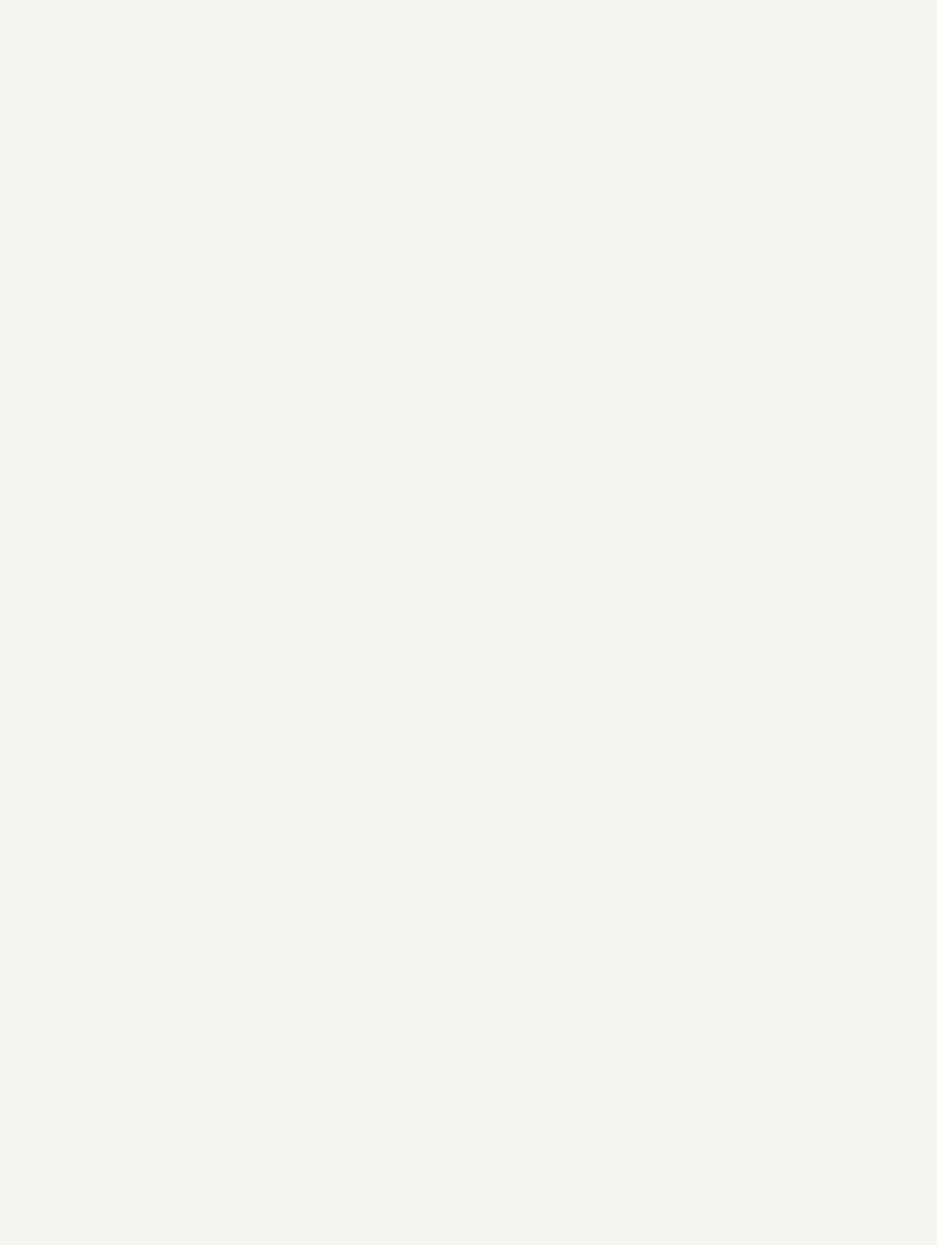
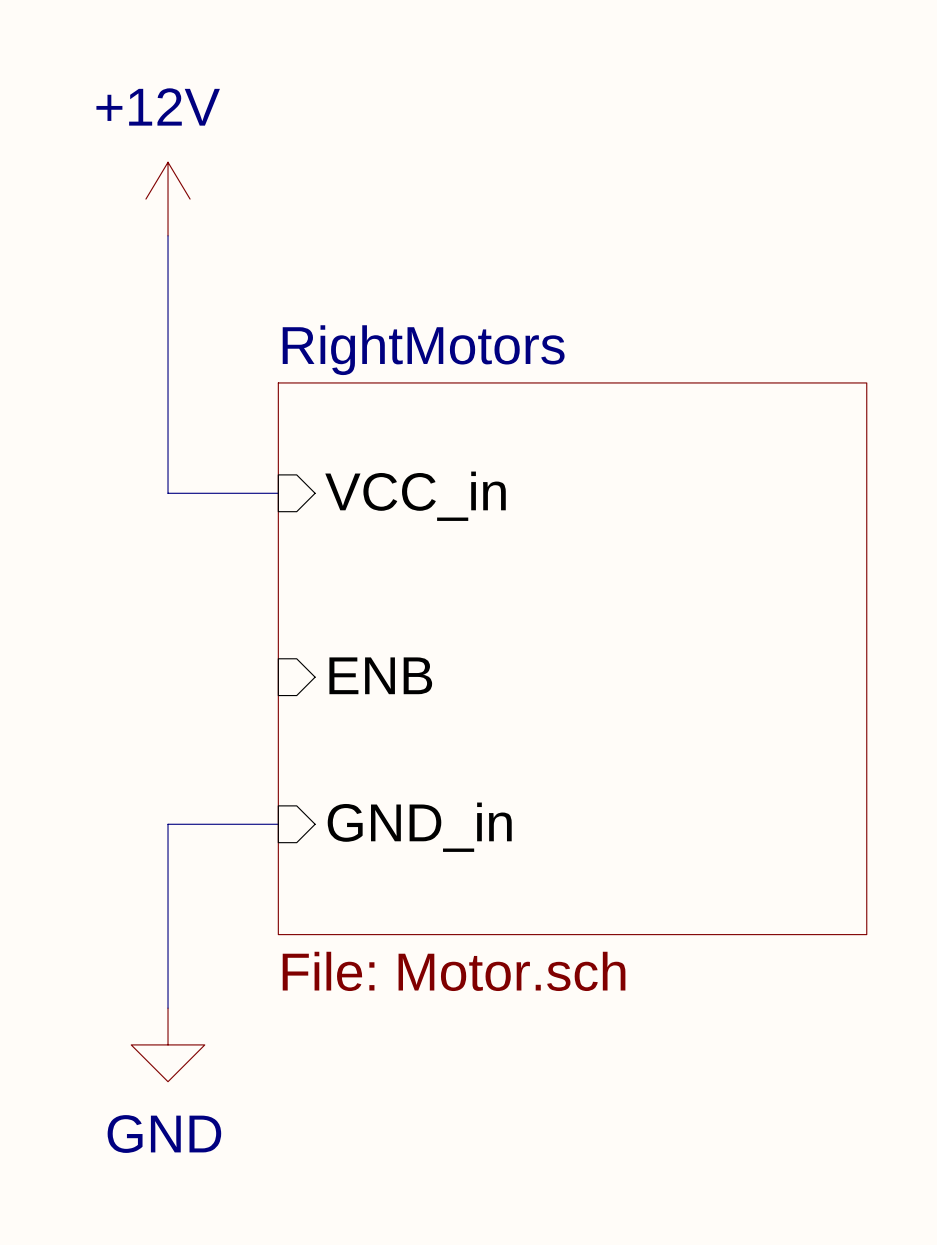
power symbol: none -> +12V (168, 199)
wire: none -> (168, 235) (168, 493) (278, 493)
sheet pin: none -> VCC_in (415, 496)
sheet RightMotors: none -> File: Motor.sch (572, 658)
sheet pin: none -> ENB (380, 675)
wire: none -> (278, 824) (168, 824) (168, 1008)
sheet pin: none -> GND_in (419, 827)
power symbol: none -> GND (168, 1044)

